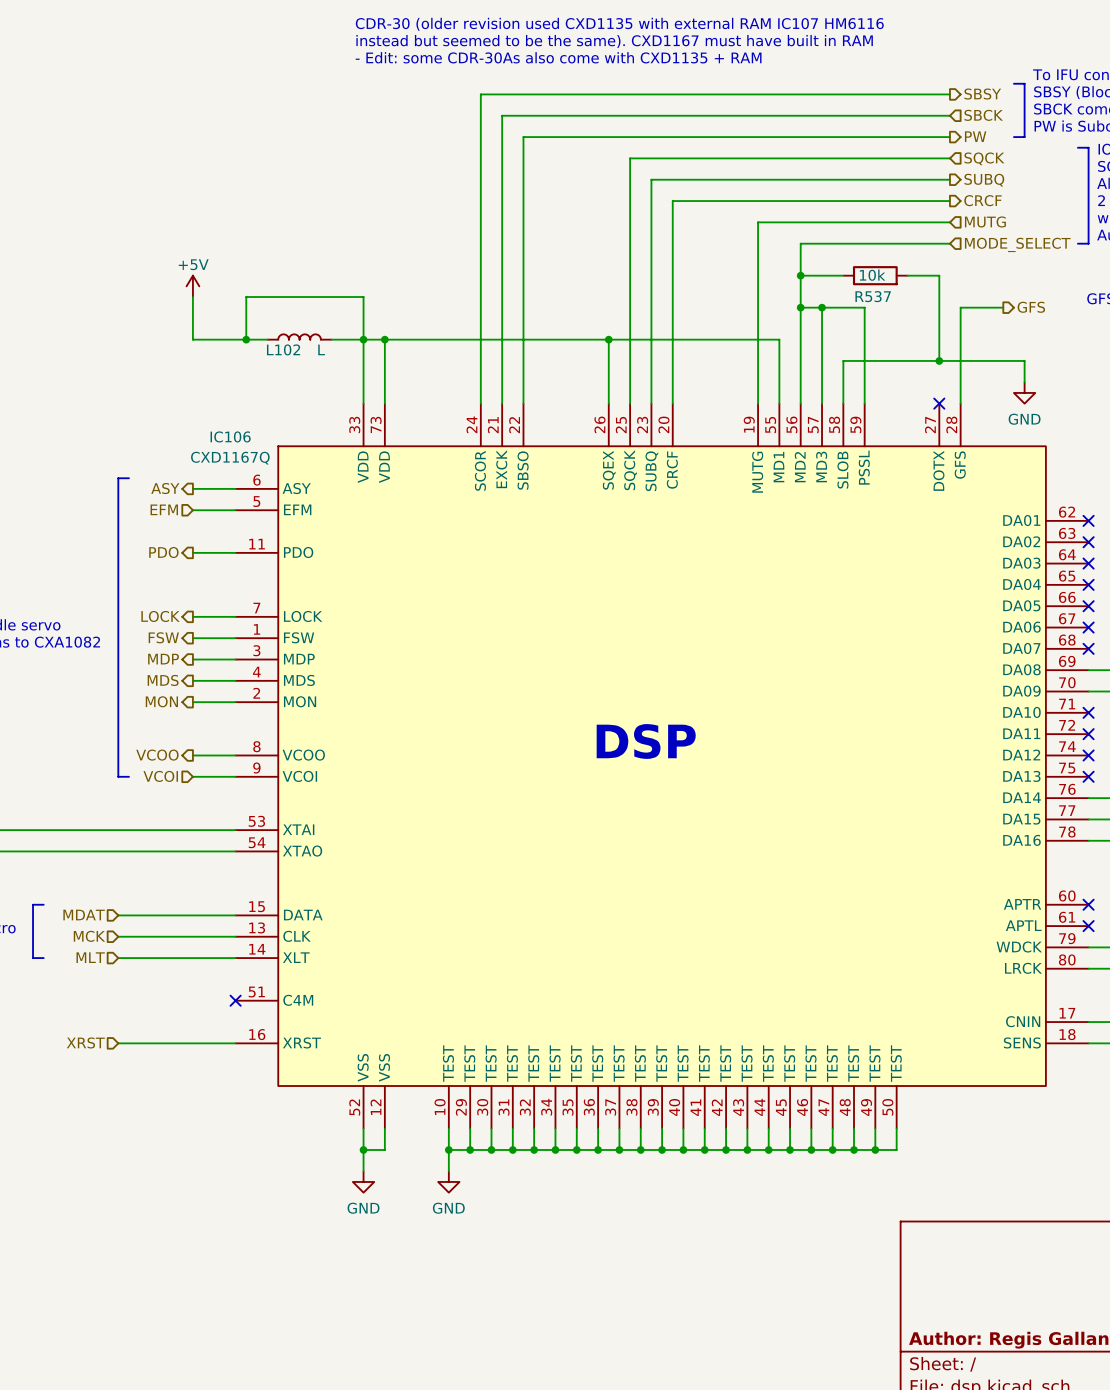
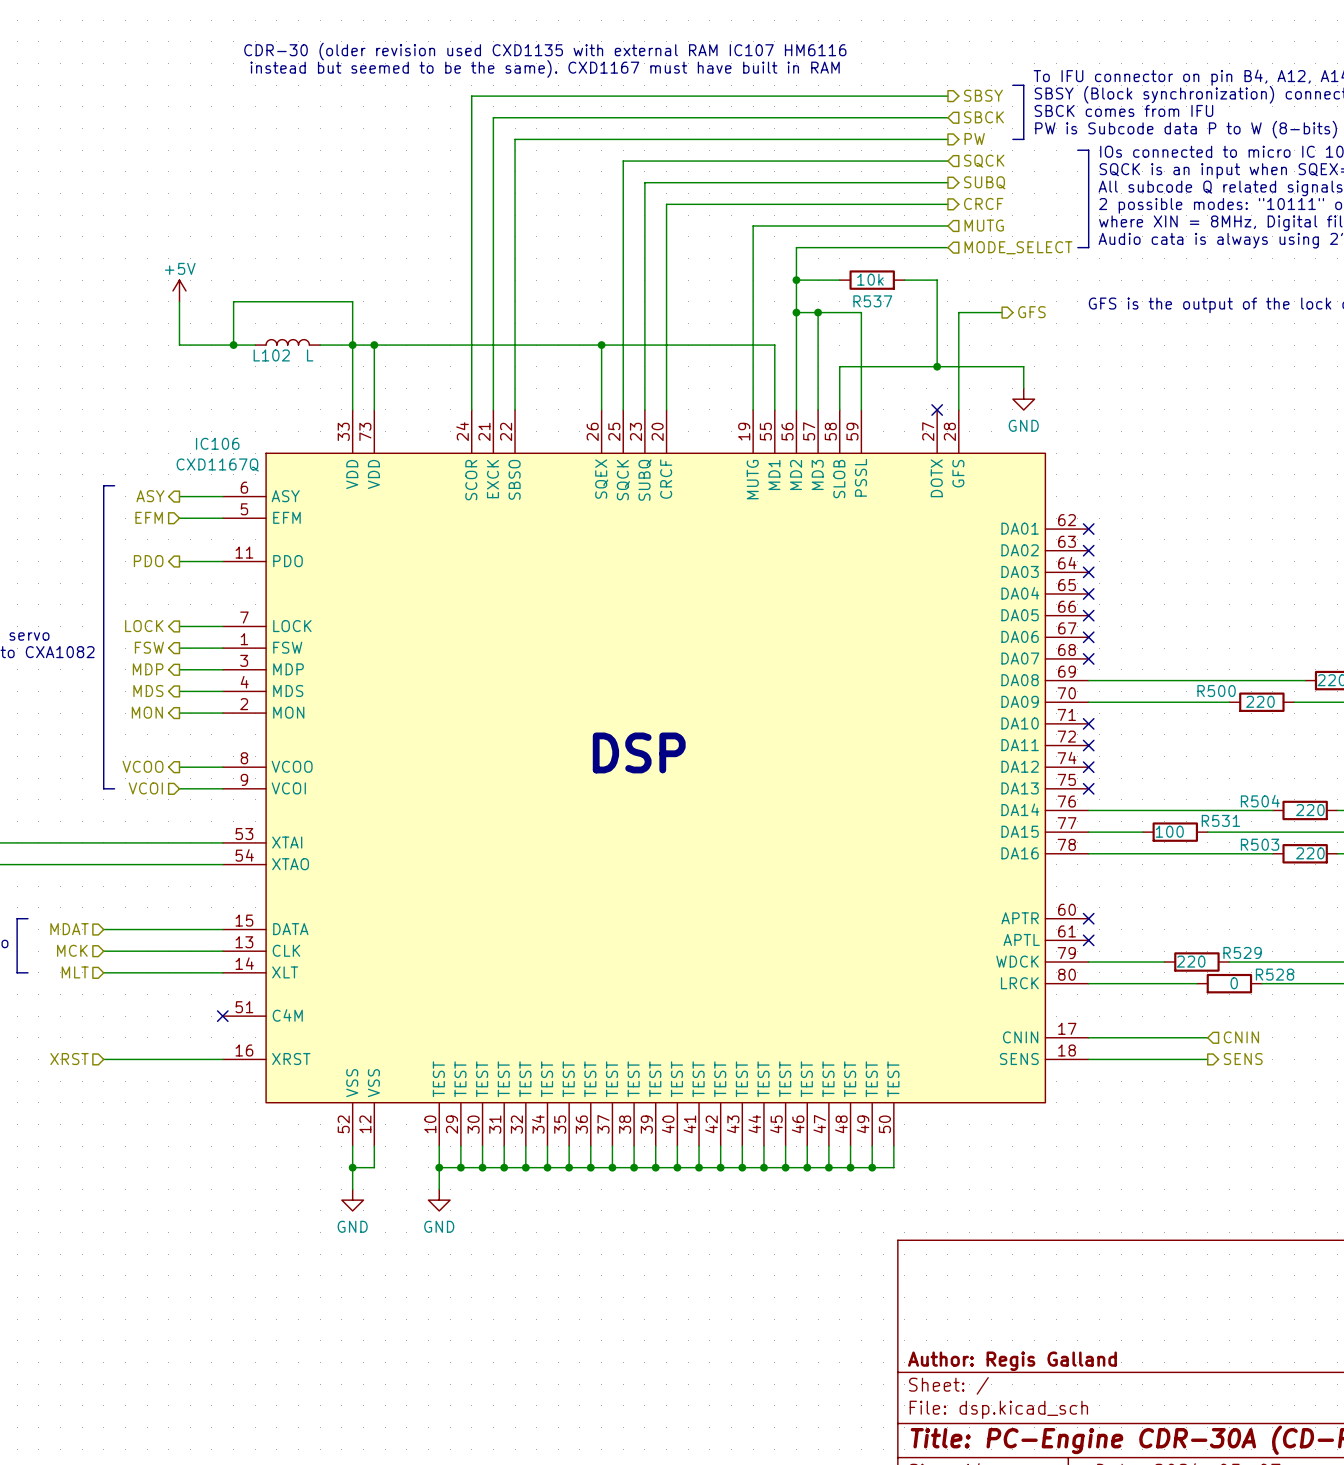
text position: CDR-30 (older revision used CXD1135 with external RAM IC107 HM6116 (619, 24) -> CDR-30 (older revision used CXD1135 with external RAM IC107 HM6116 (545, 51)
text position: instead but seemed to be the same). CXD1167 must have built in RAM (614, 41) -> instead but seemed to be the same). CXD1167 must have built in RAM (545, 68)
text: - Edit: some CDR-30As also come with CXD1135 + RAM (558, 57) -> none

